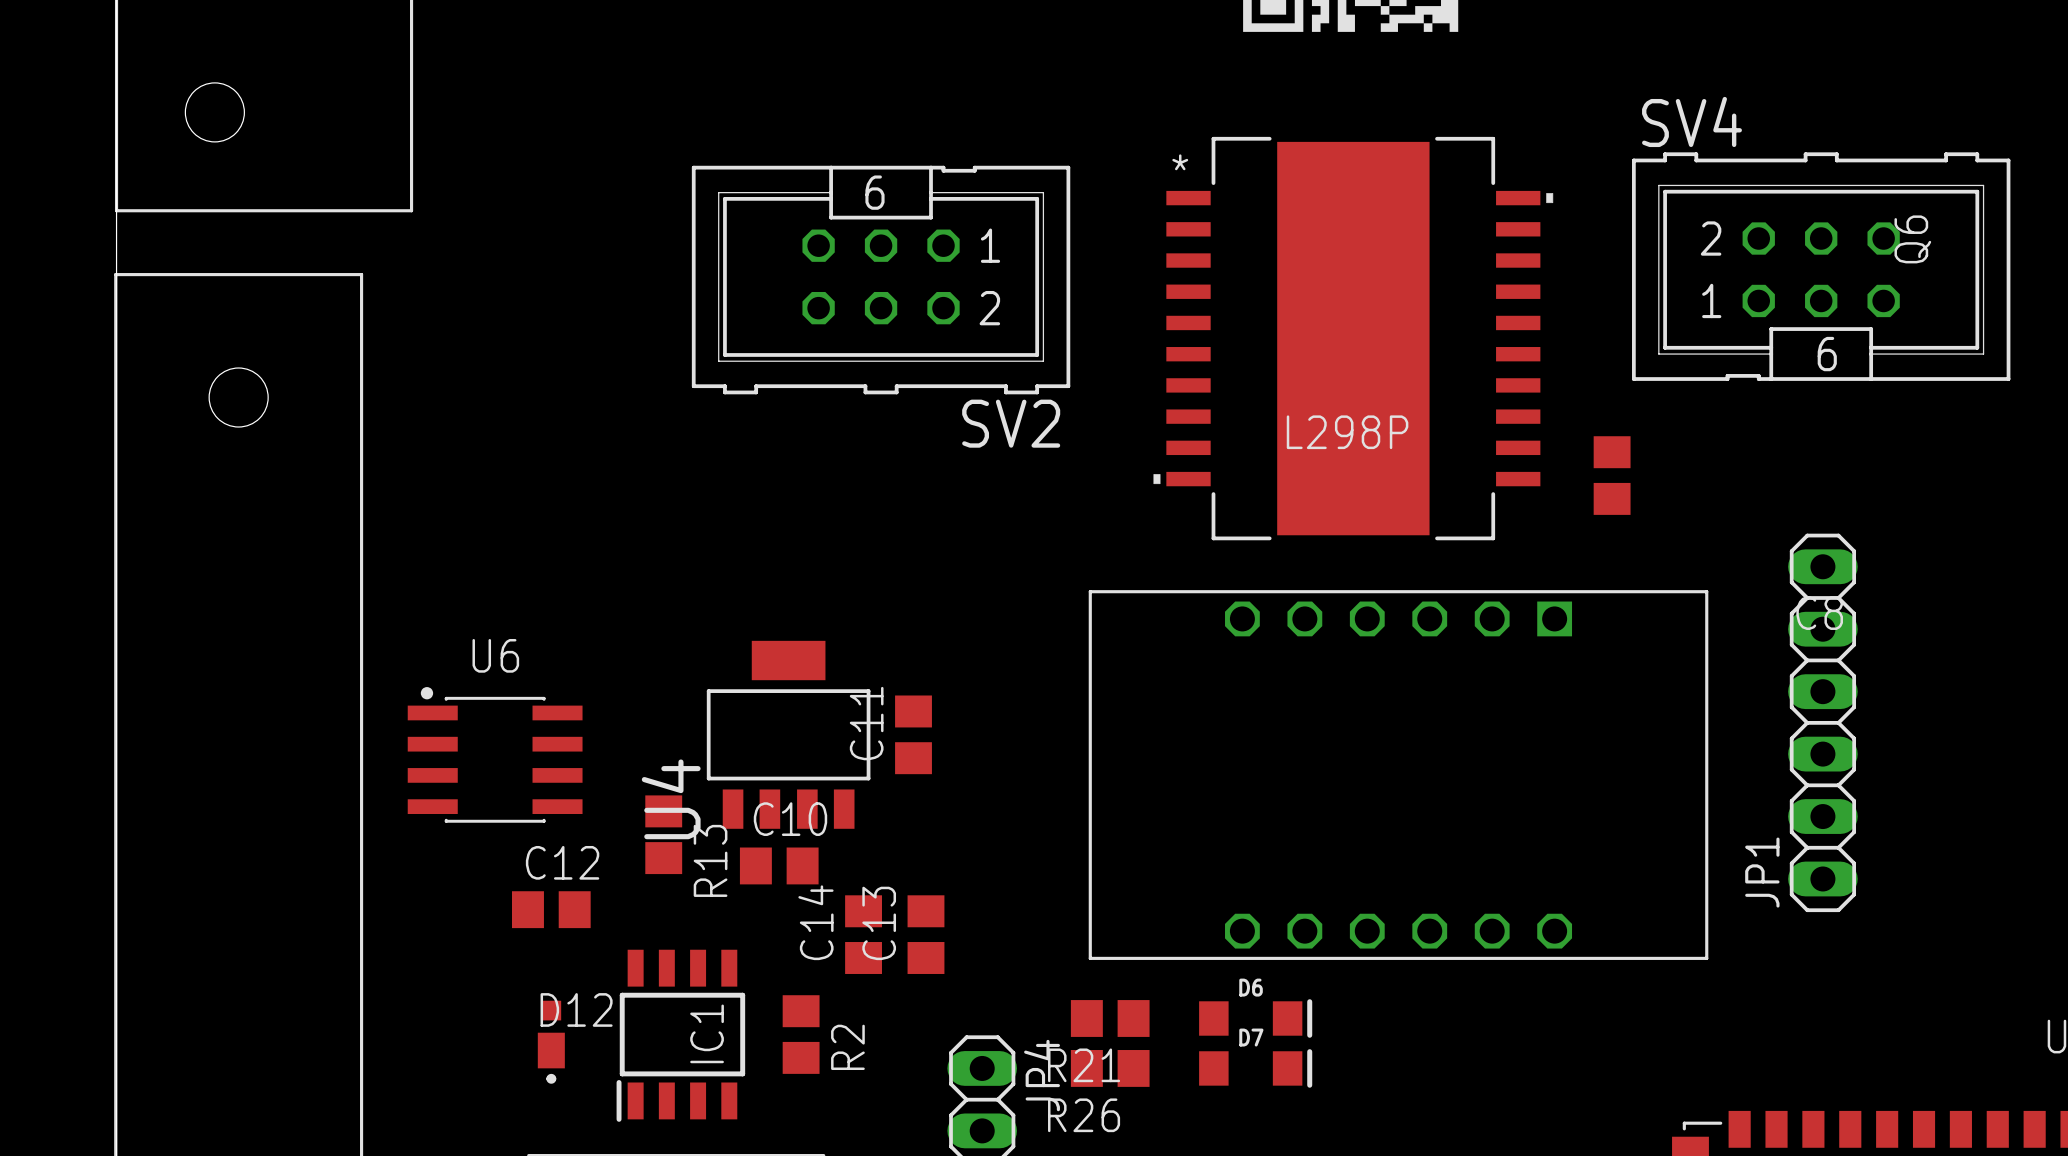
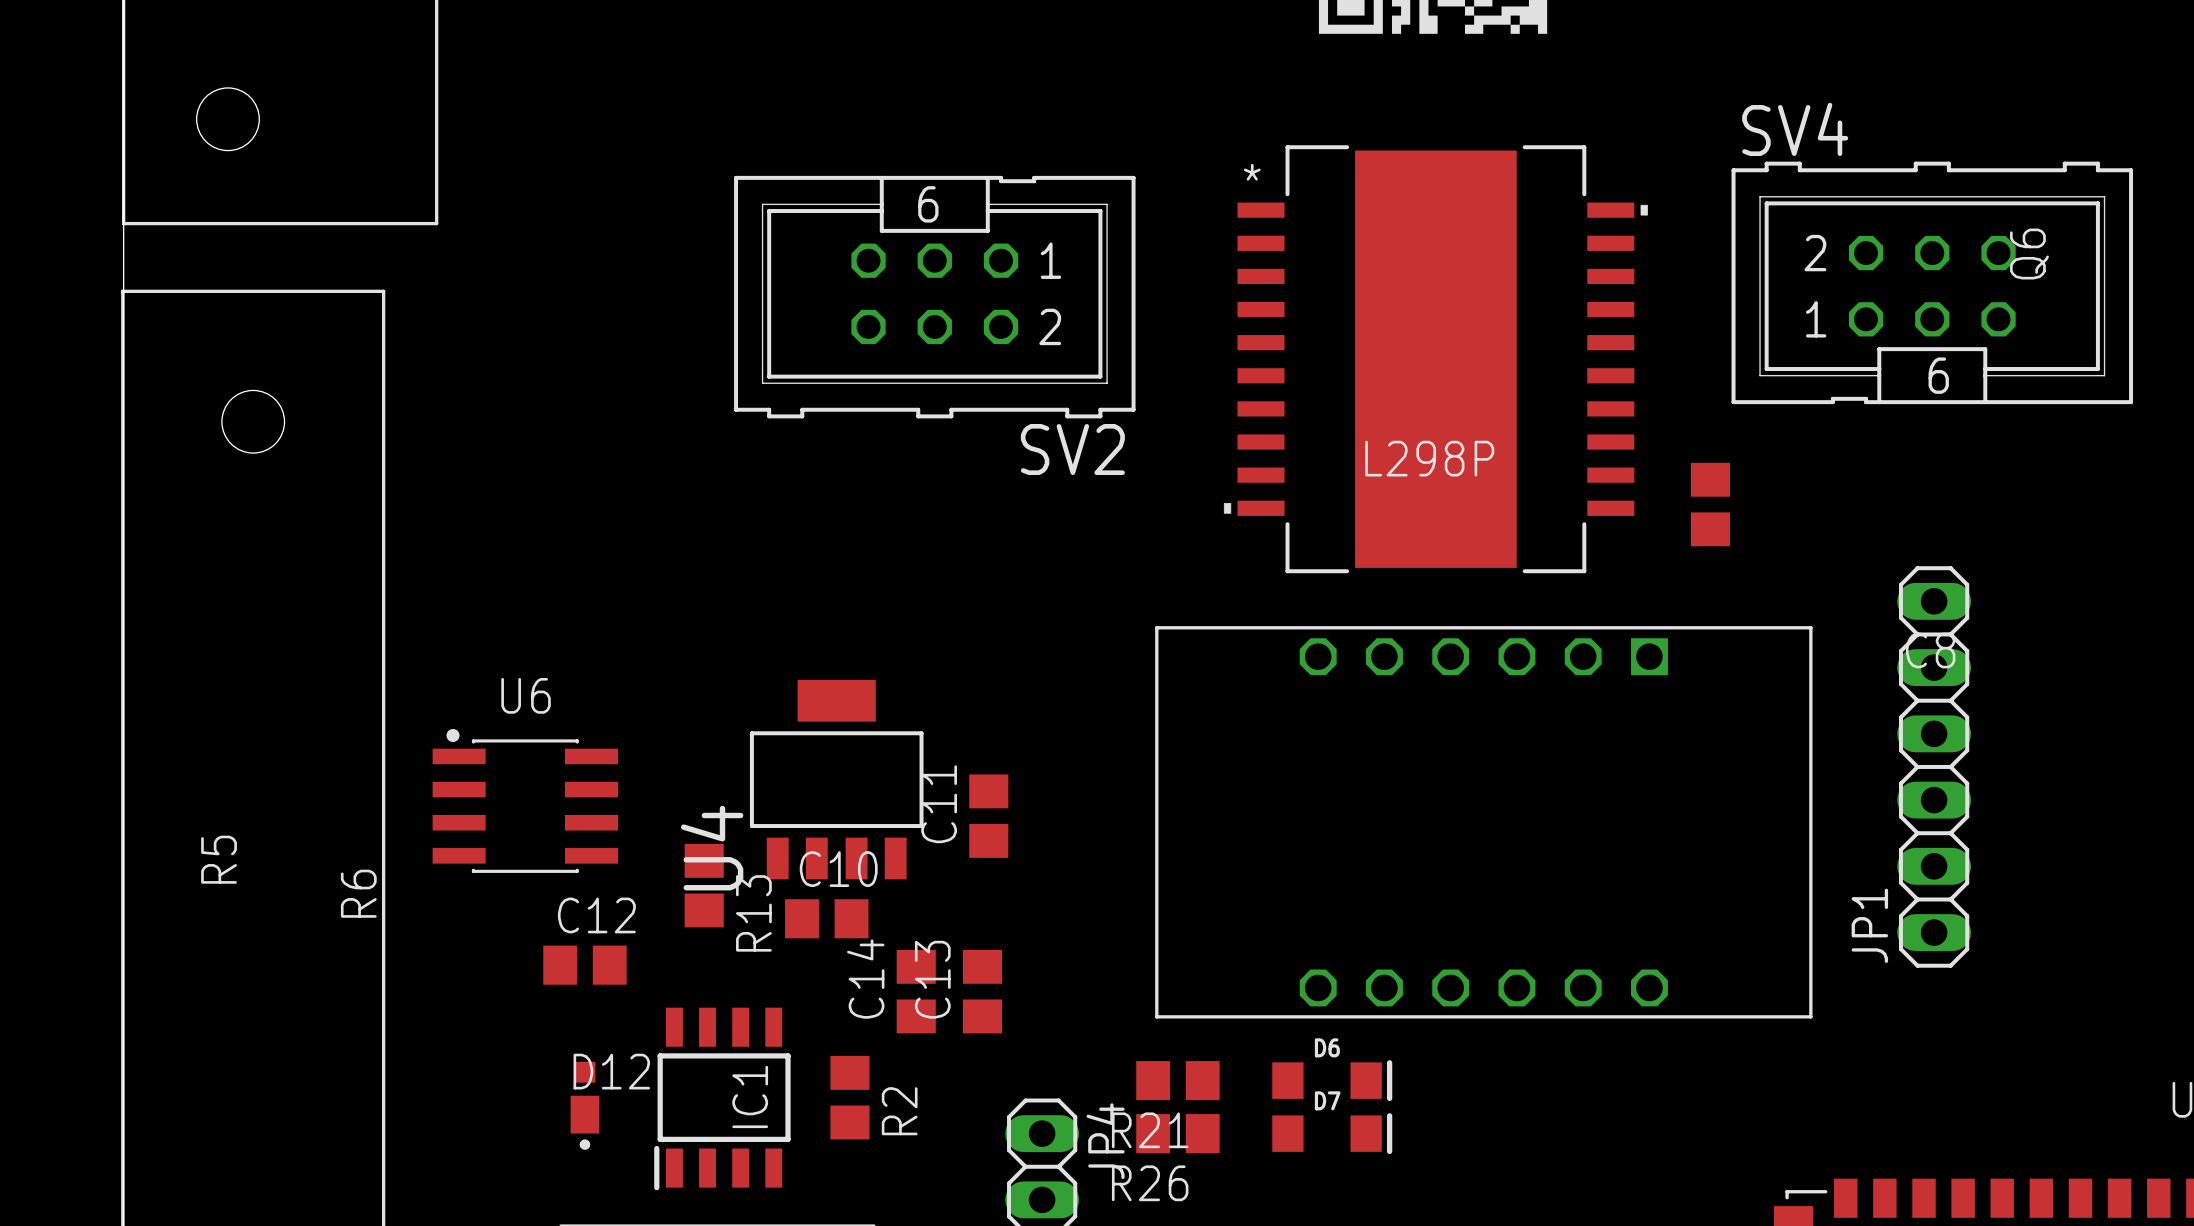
C11 position: (913, 734) -> (988, 816)
R5: none -> (219, 859)
R6: none -> (358, 893)

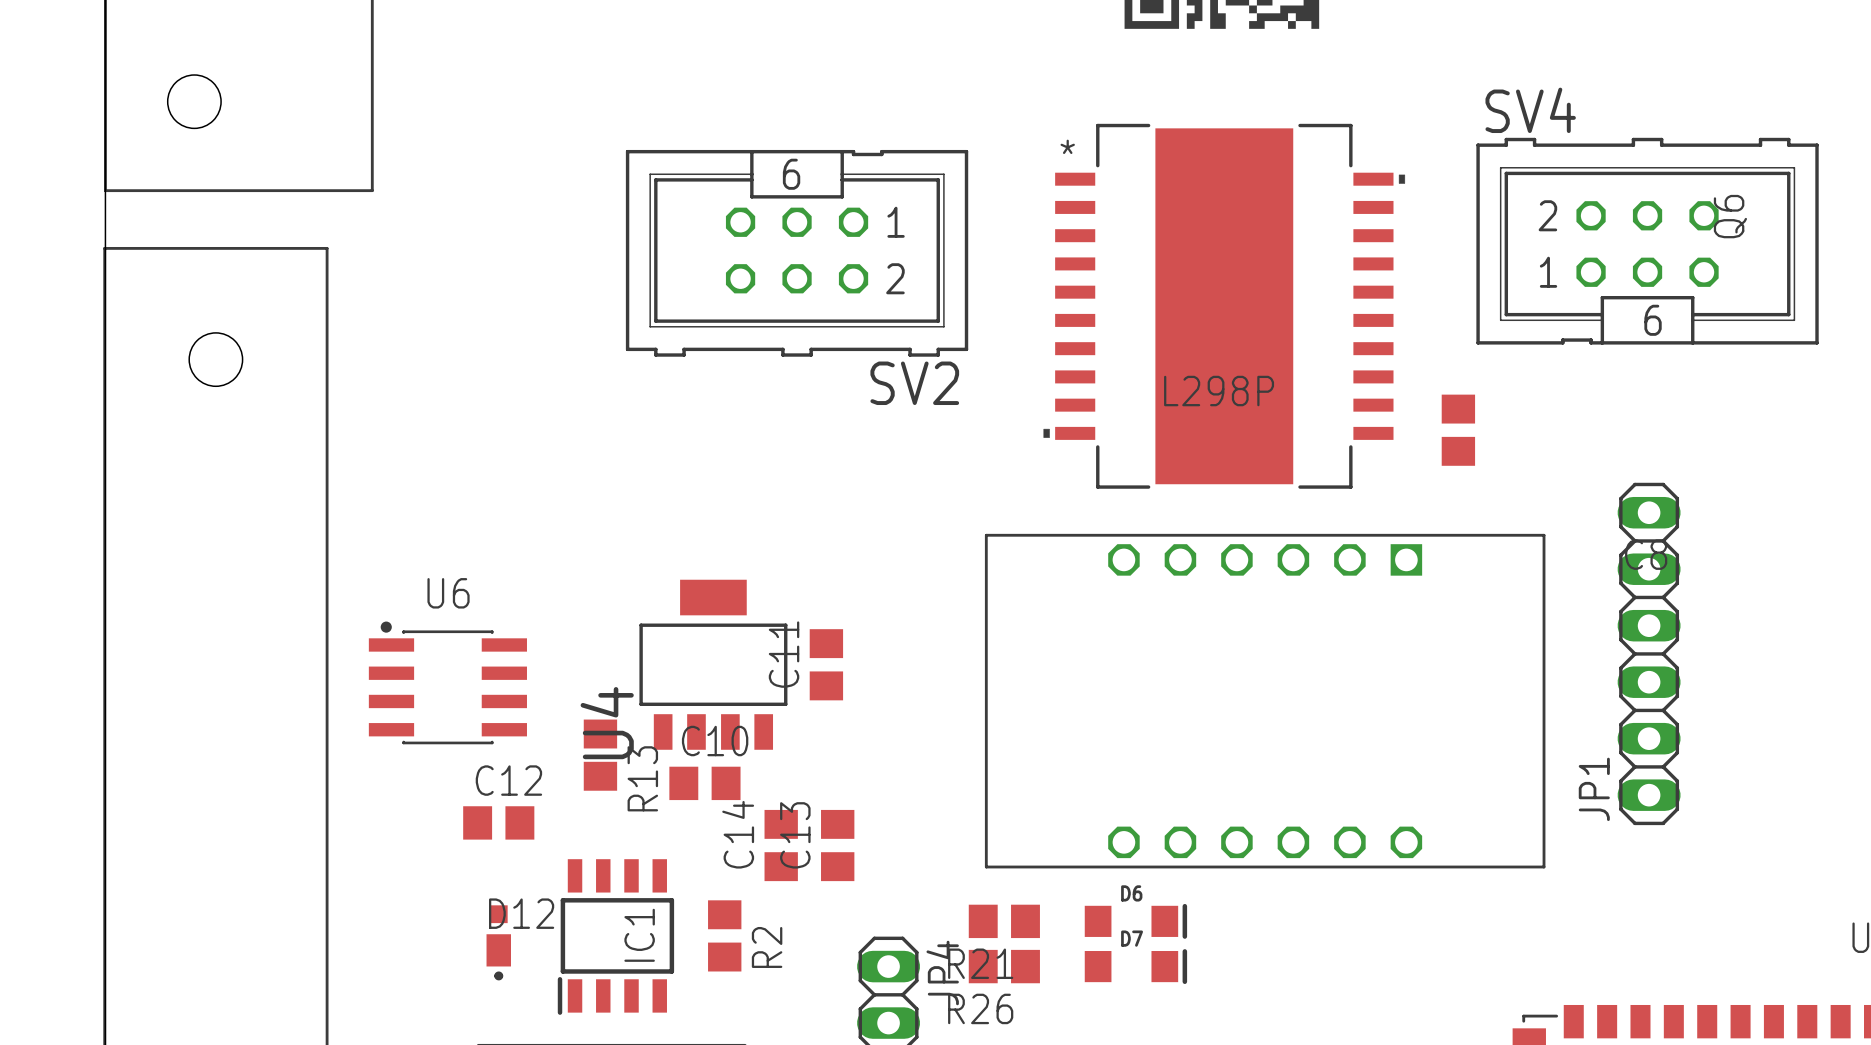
C11 position: (988, 816) -> (826, 664)
R5: (219, 859) -> none
R6: (358, 893) -> none

